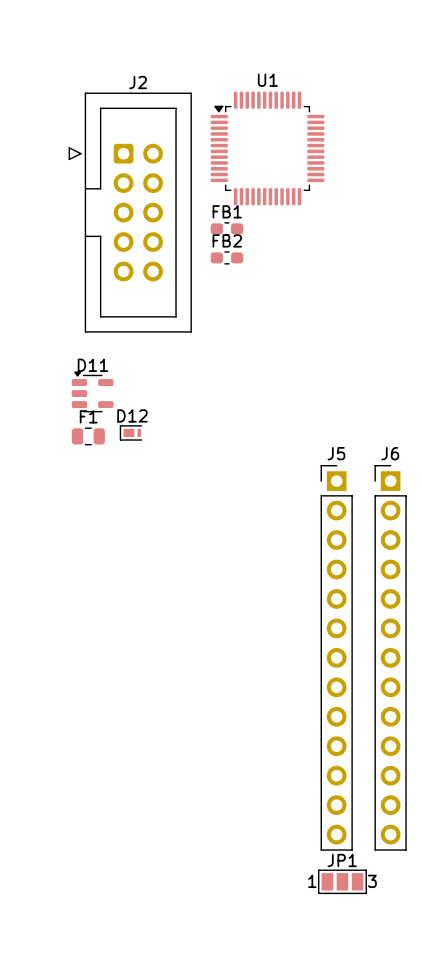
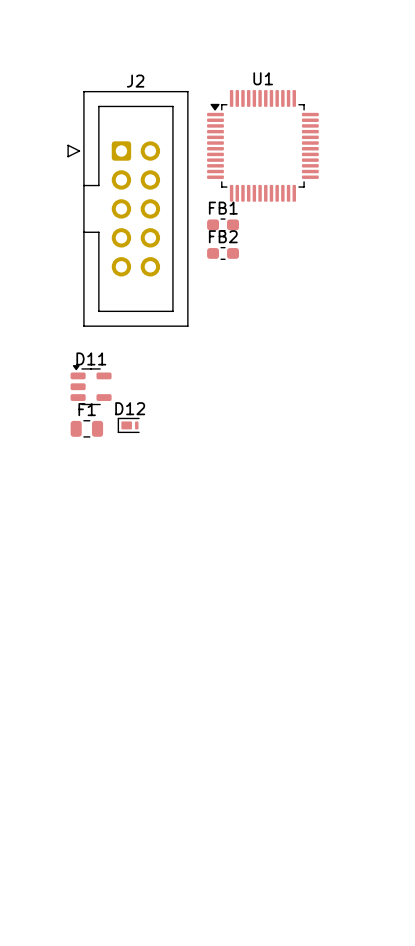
J5: (336, 657) -> none
J6: (390, 657) -> none
JP1: (342, 881) -> none

